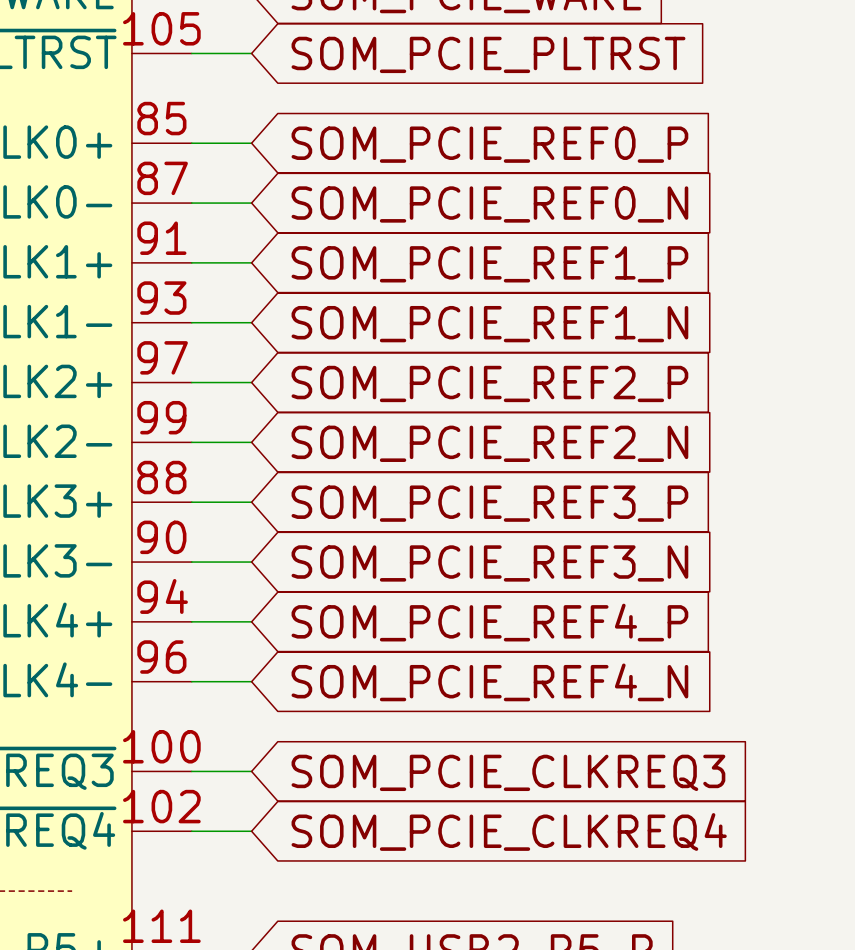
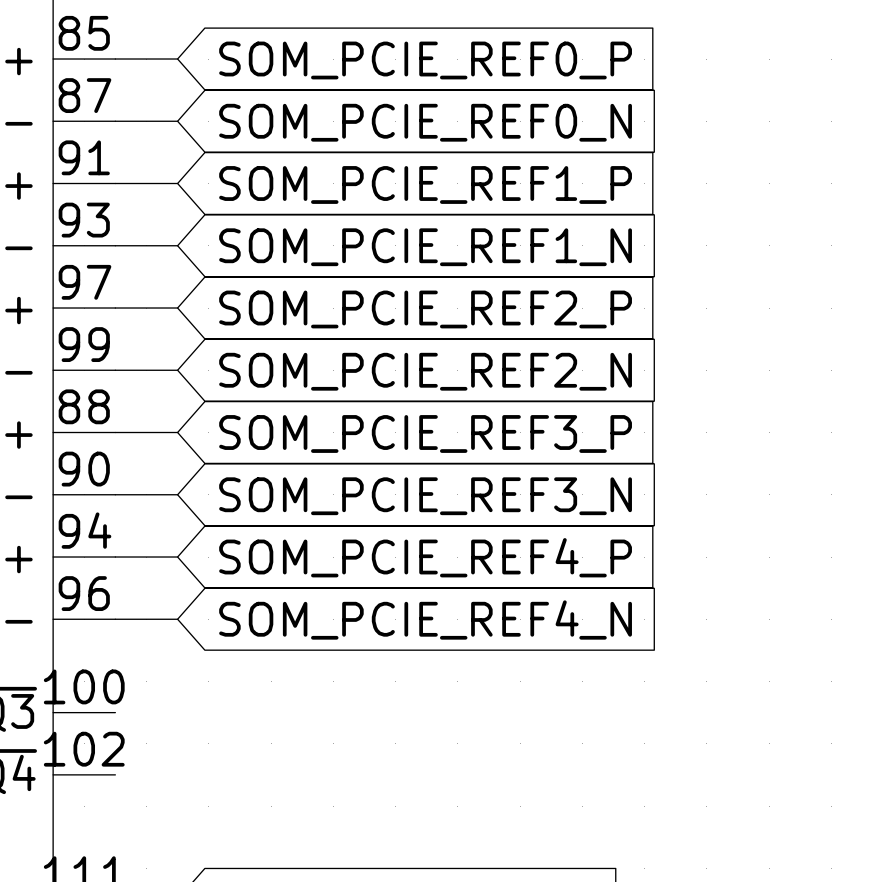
wire: (191, 771) (251, 771) -> none
global label: SOM_PCIE_CLKREQ3 (508, 772) -> none
wire: (191, 831) (251, 831) -> none
global label: SOM_PCIE_CLKREQ4 (509, 831) -> none

